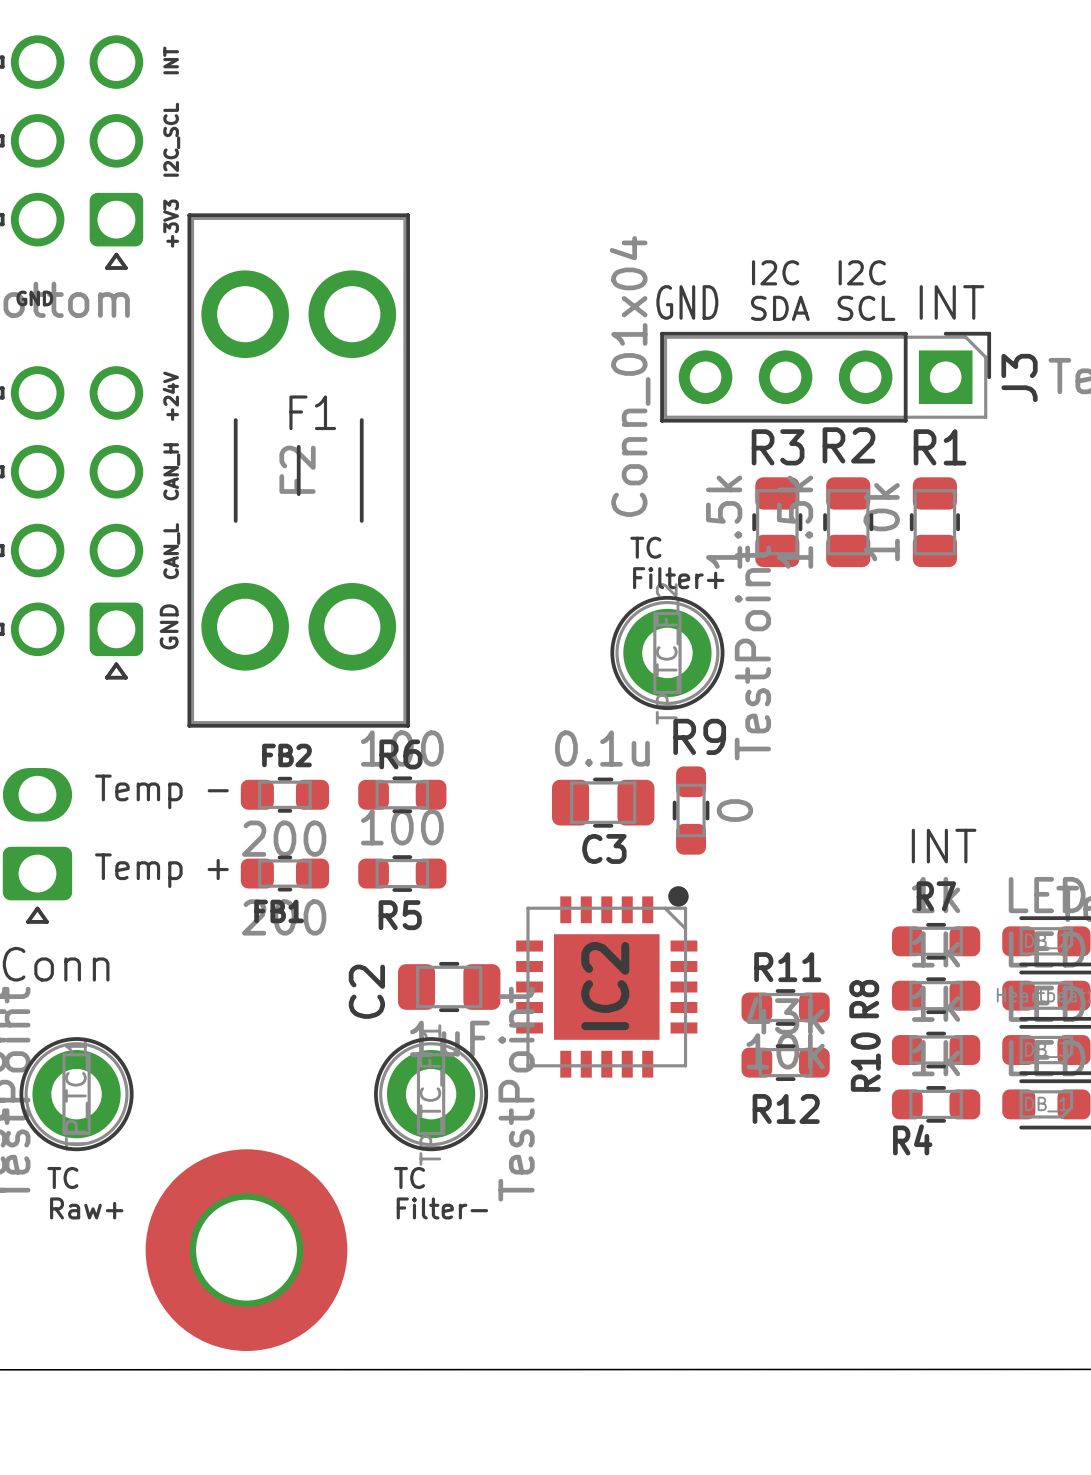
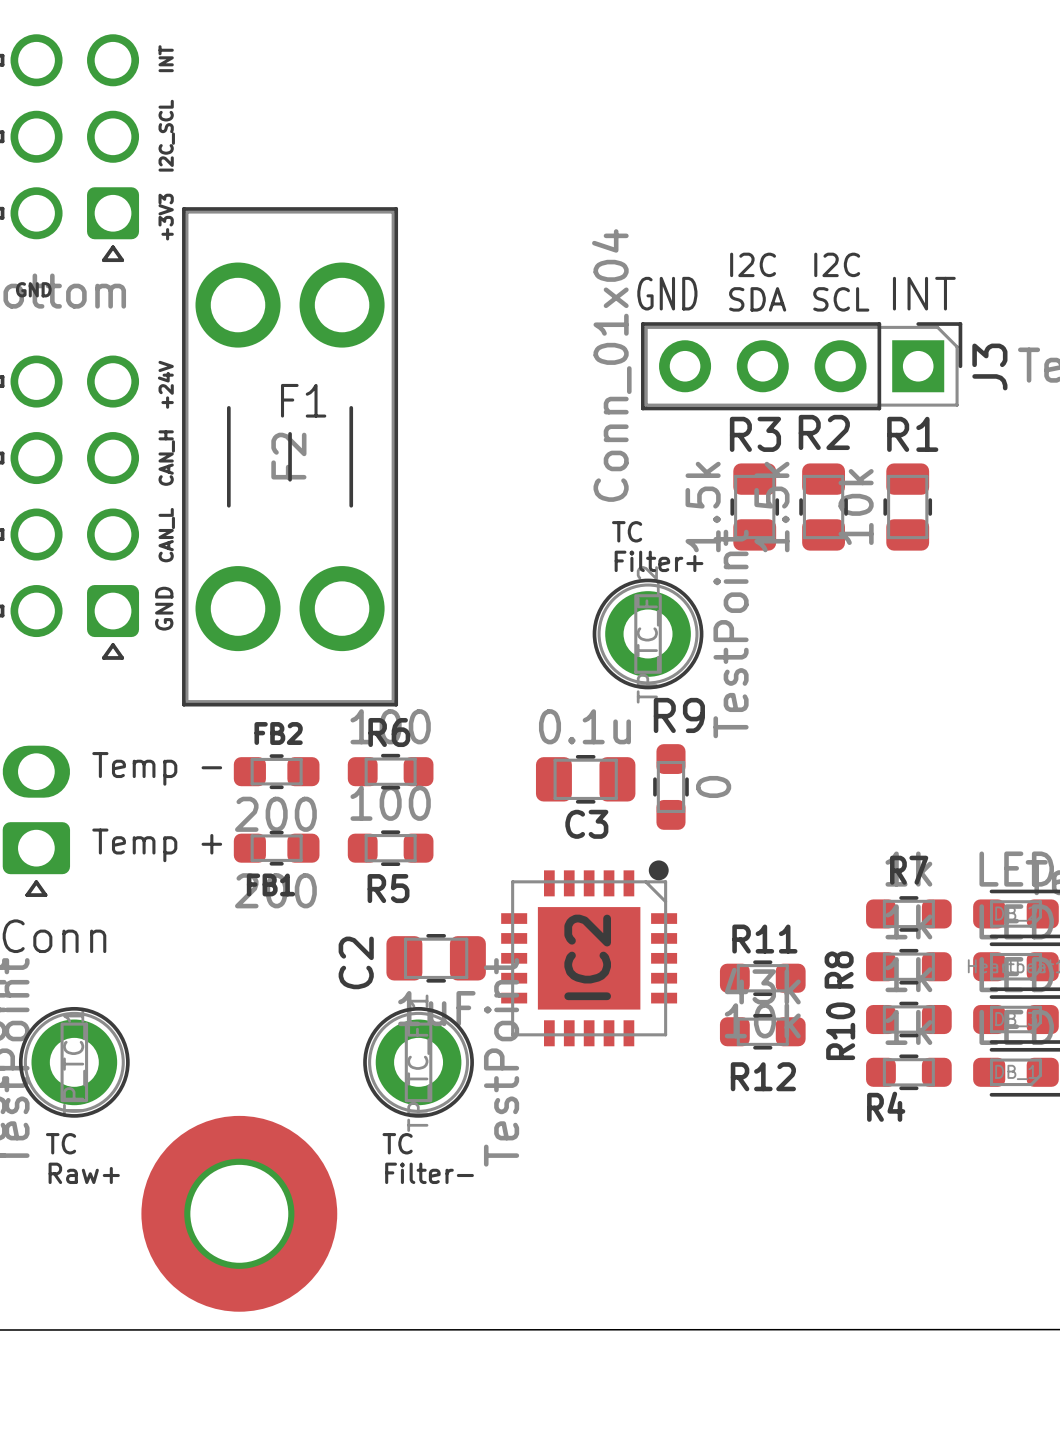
text: INT (944, 846) -> none

